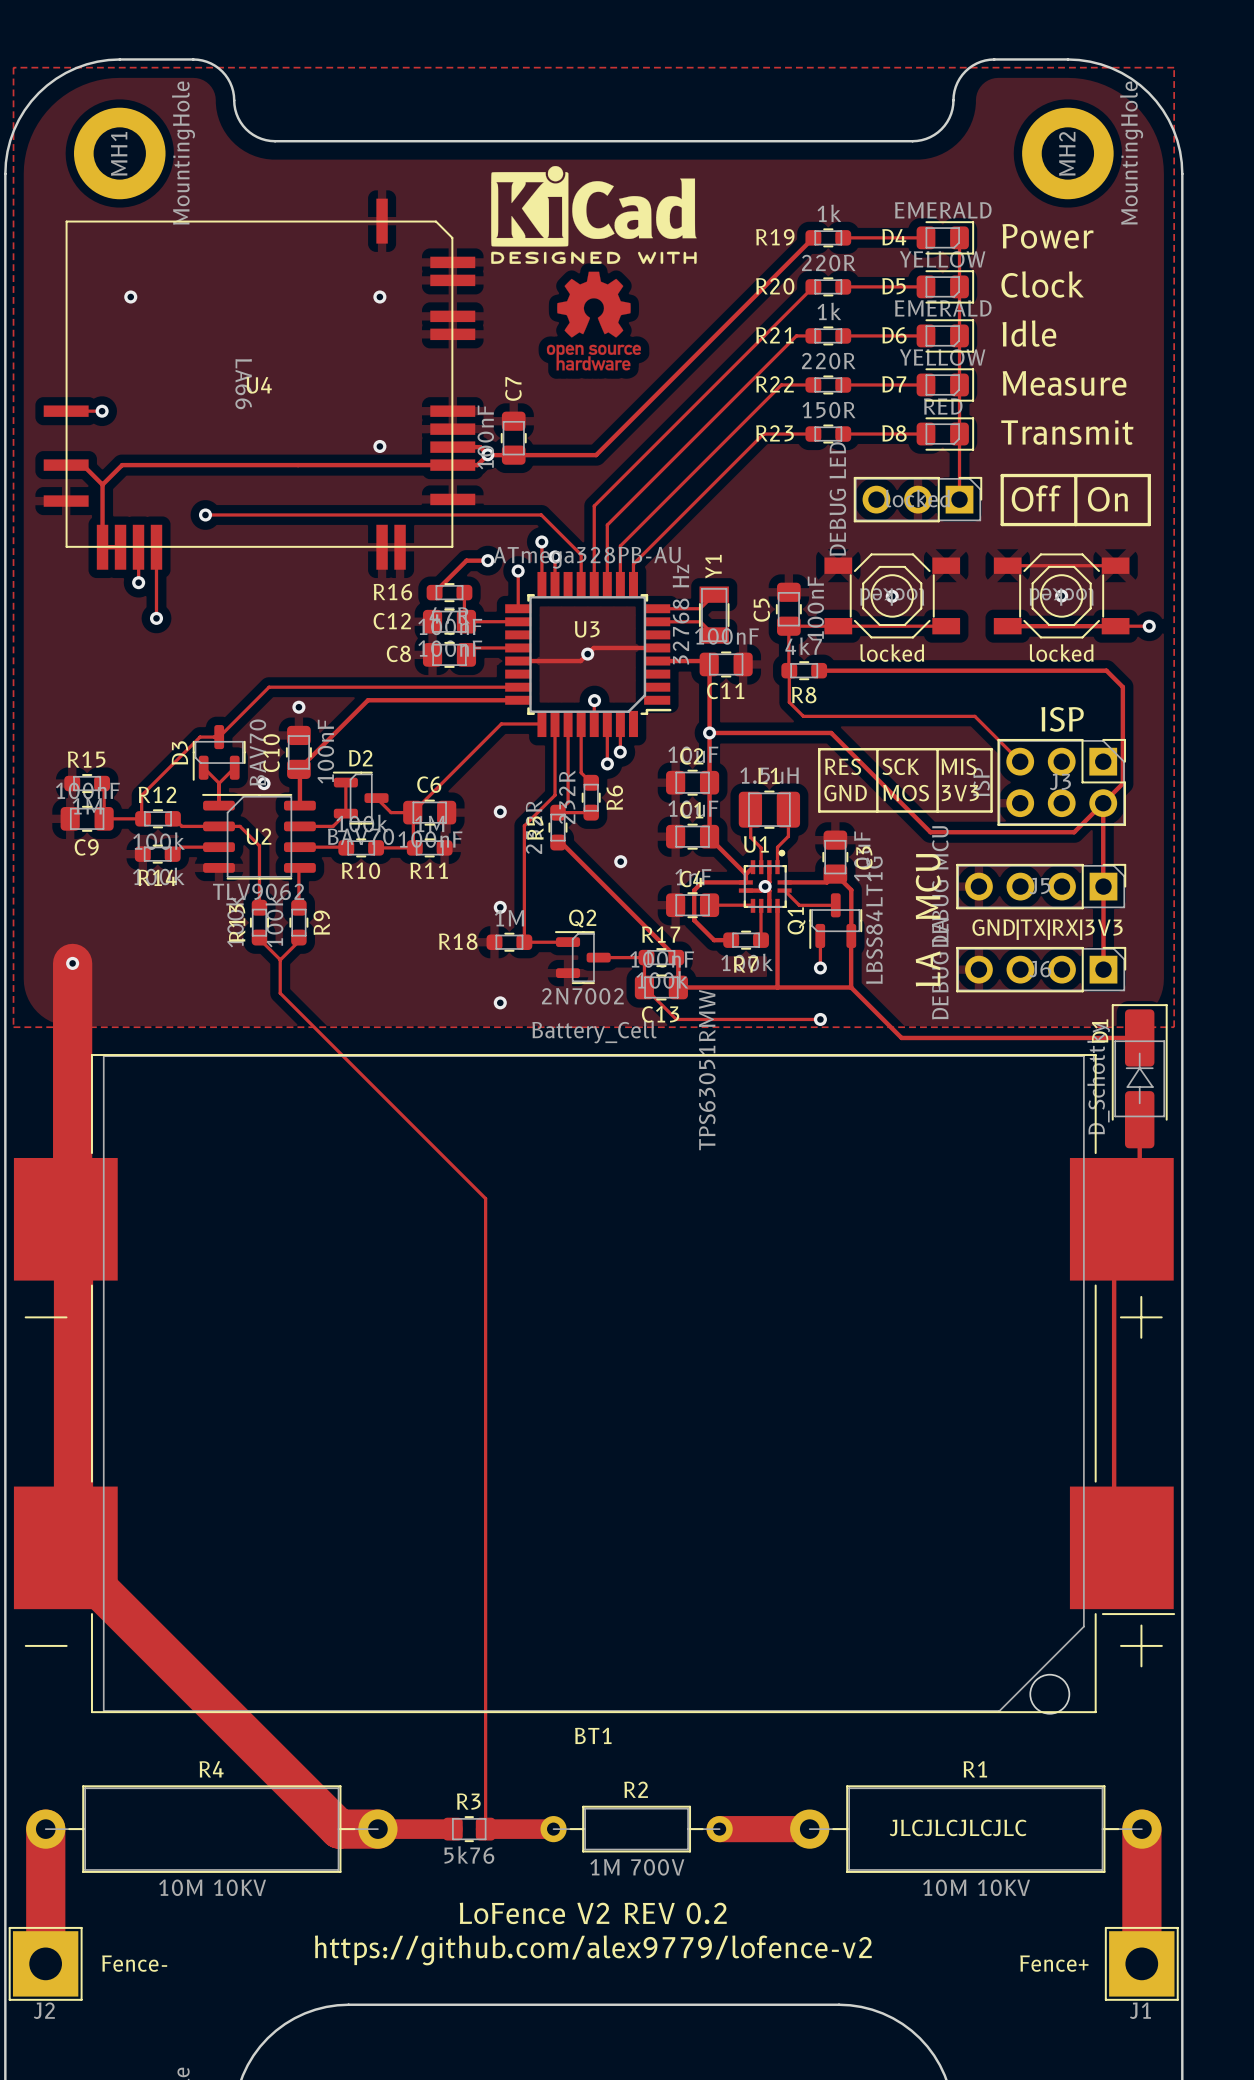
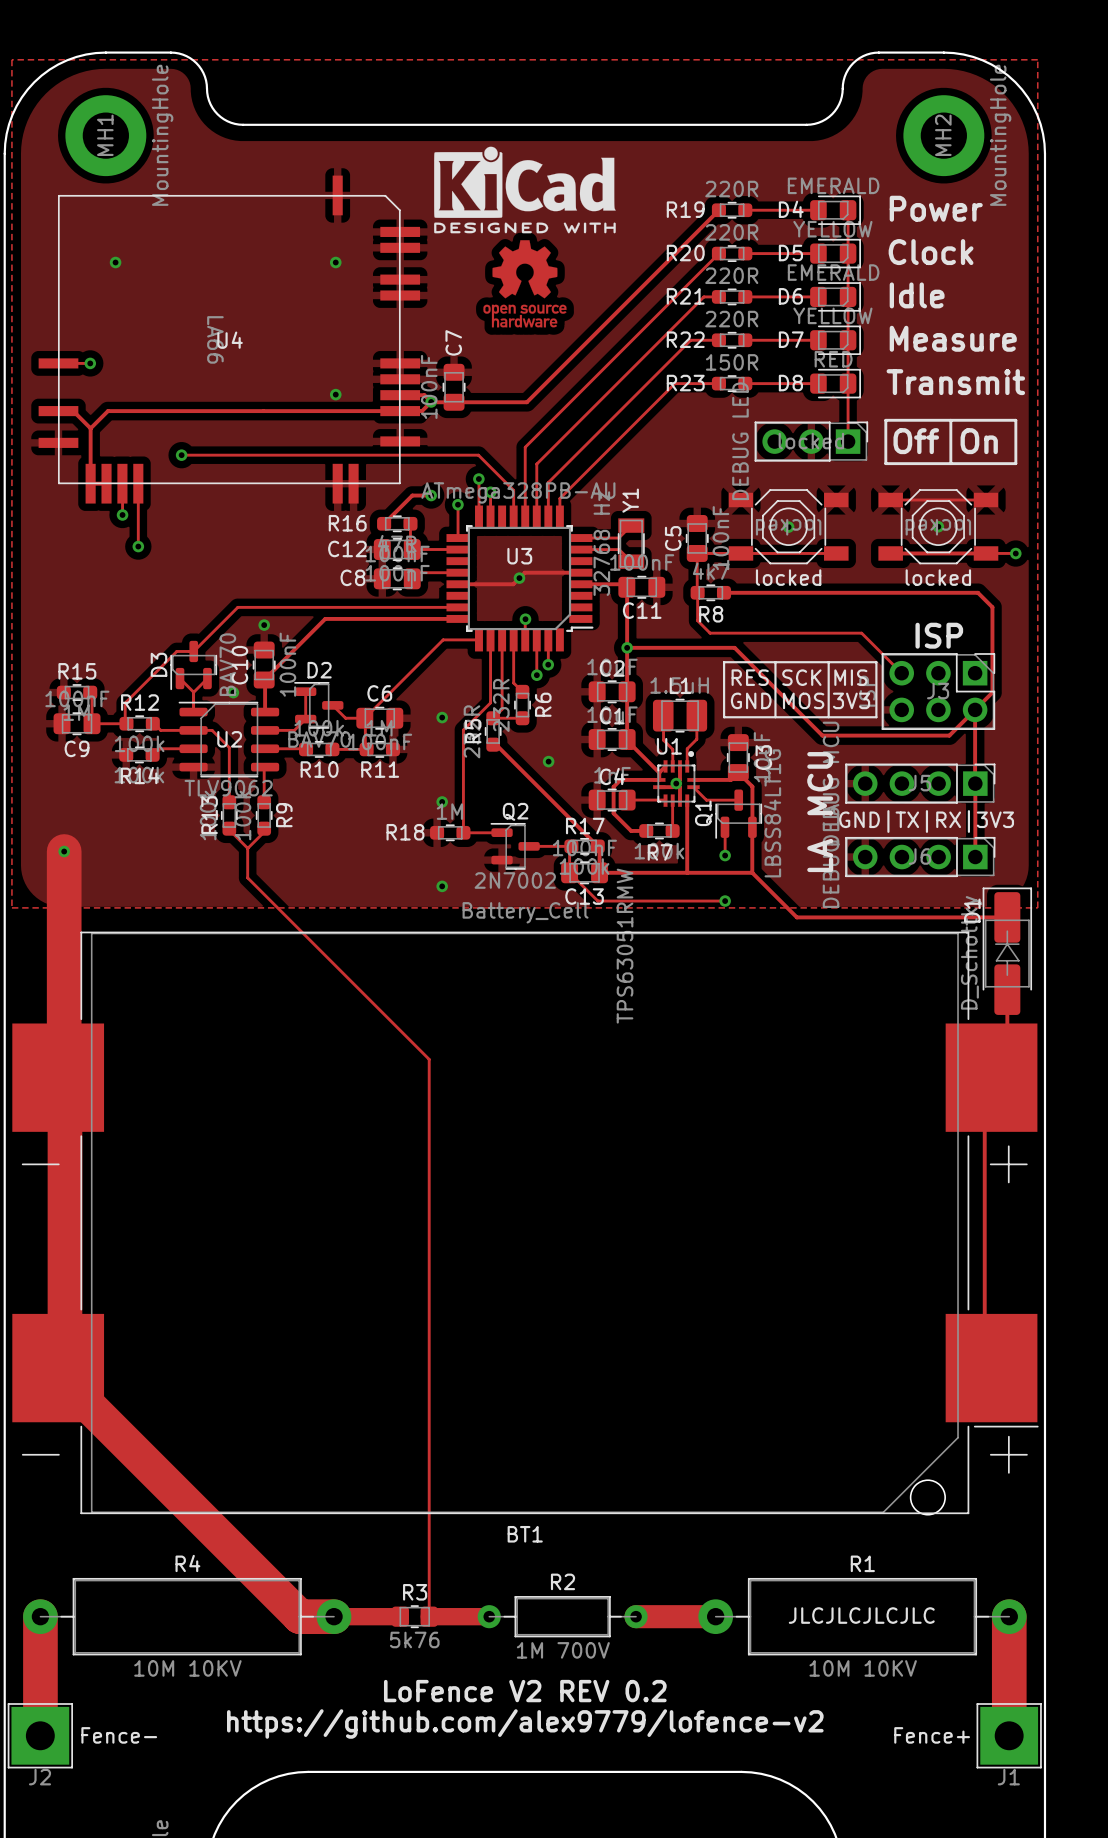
R19 value: 1k (829, 213) -> 220R (731, 189)
R21 value: 1k (829, 311) -> 220R (731, 275)

